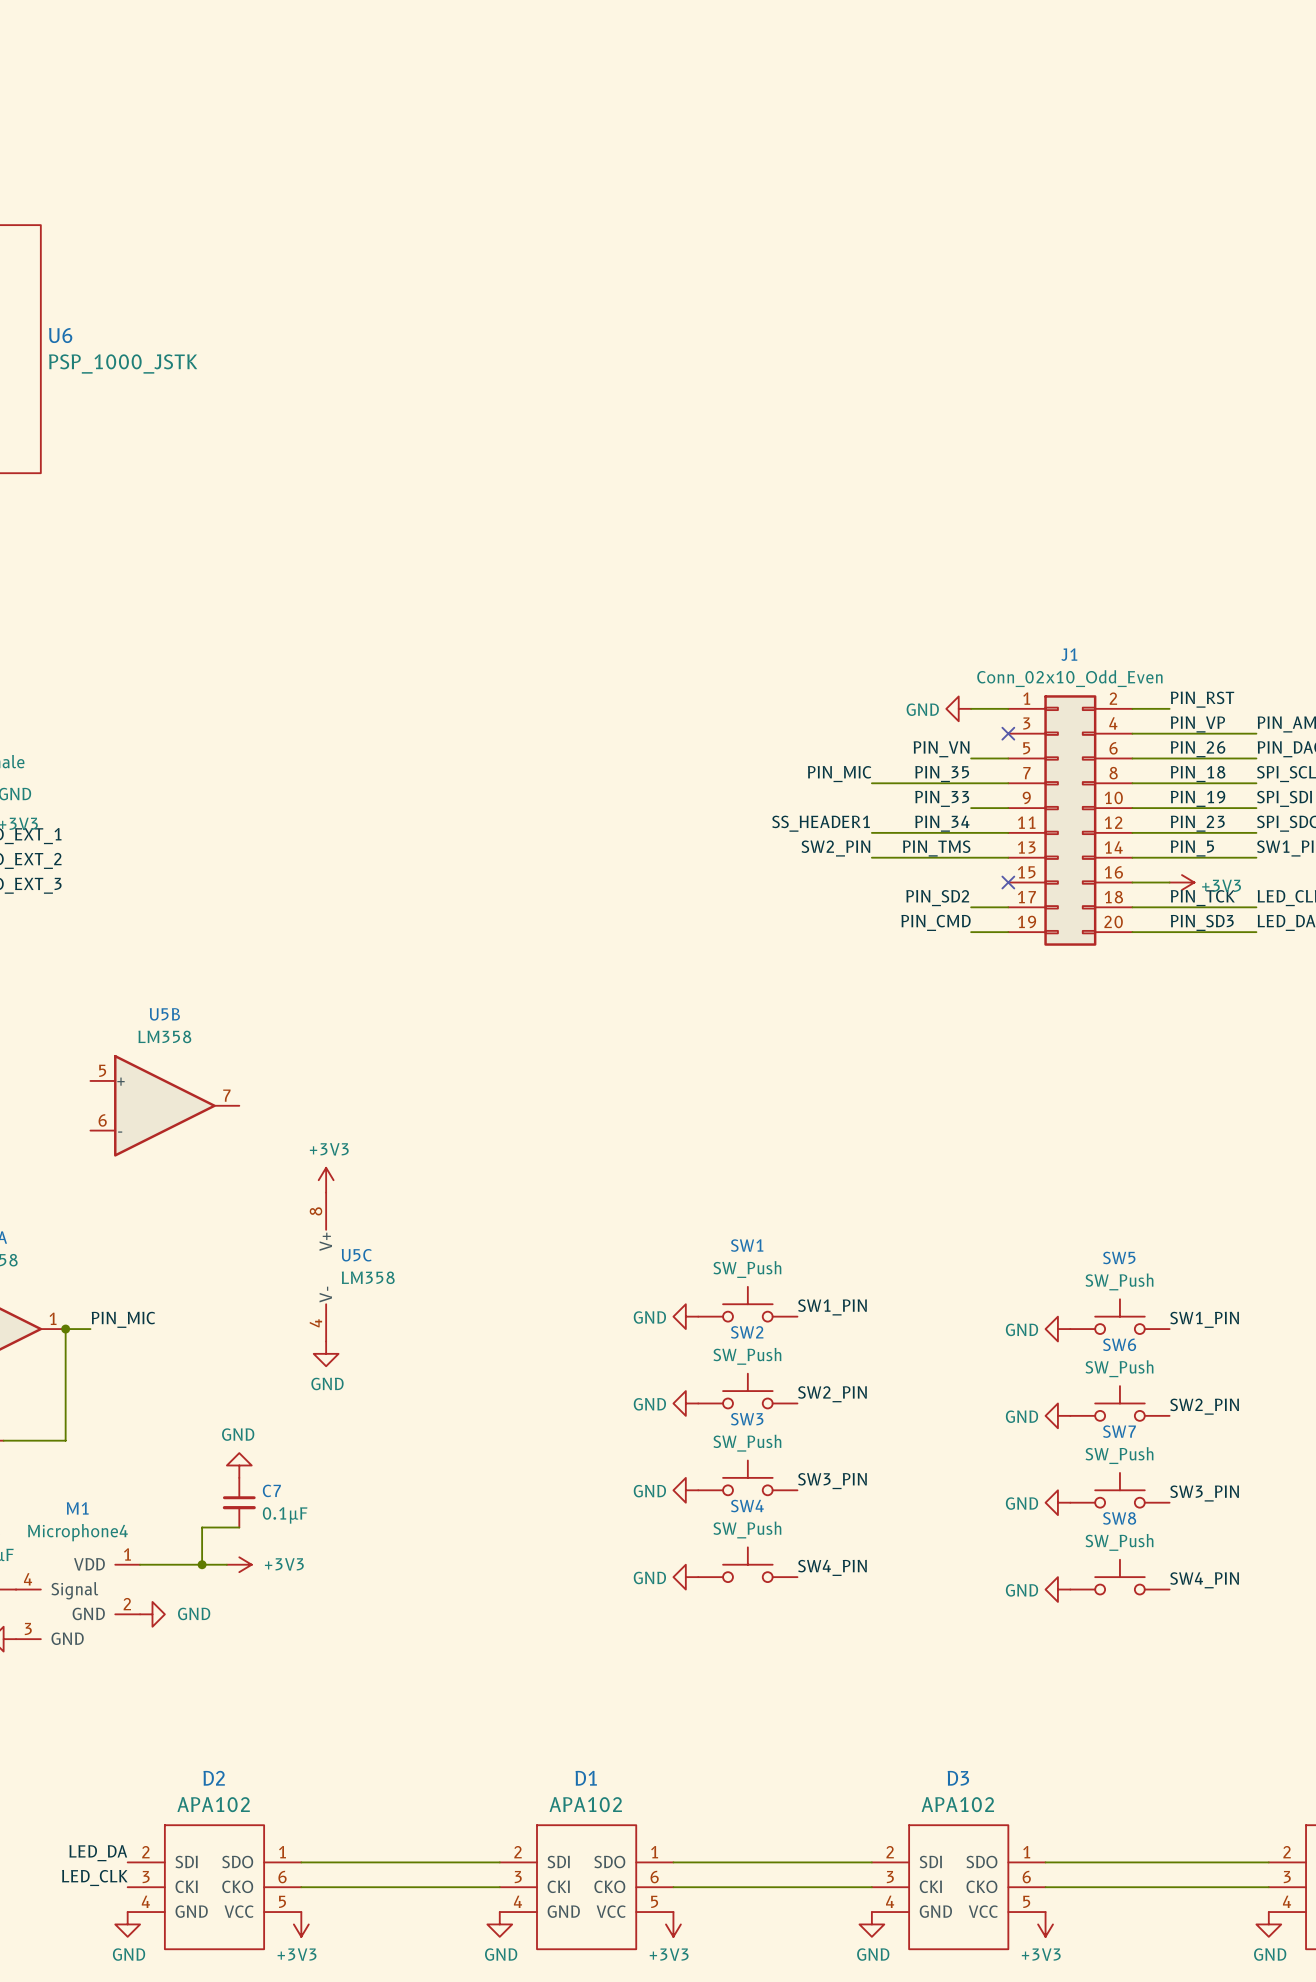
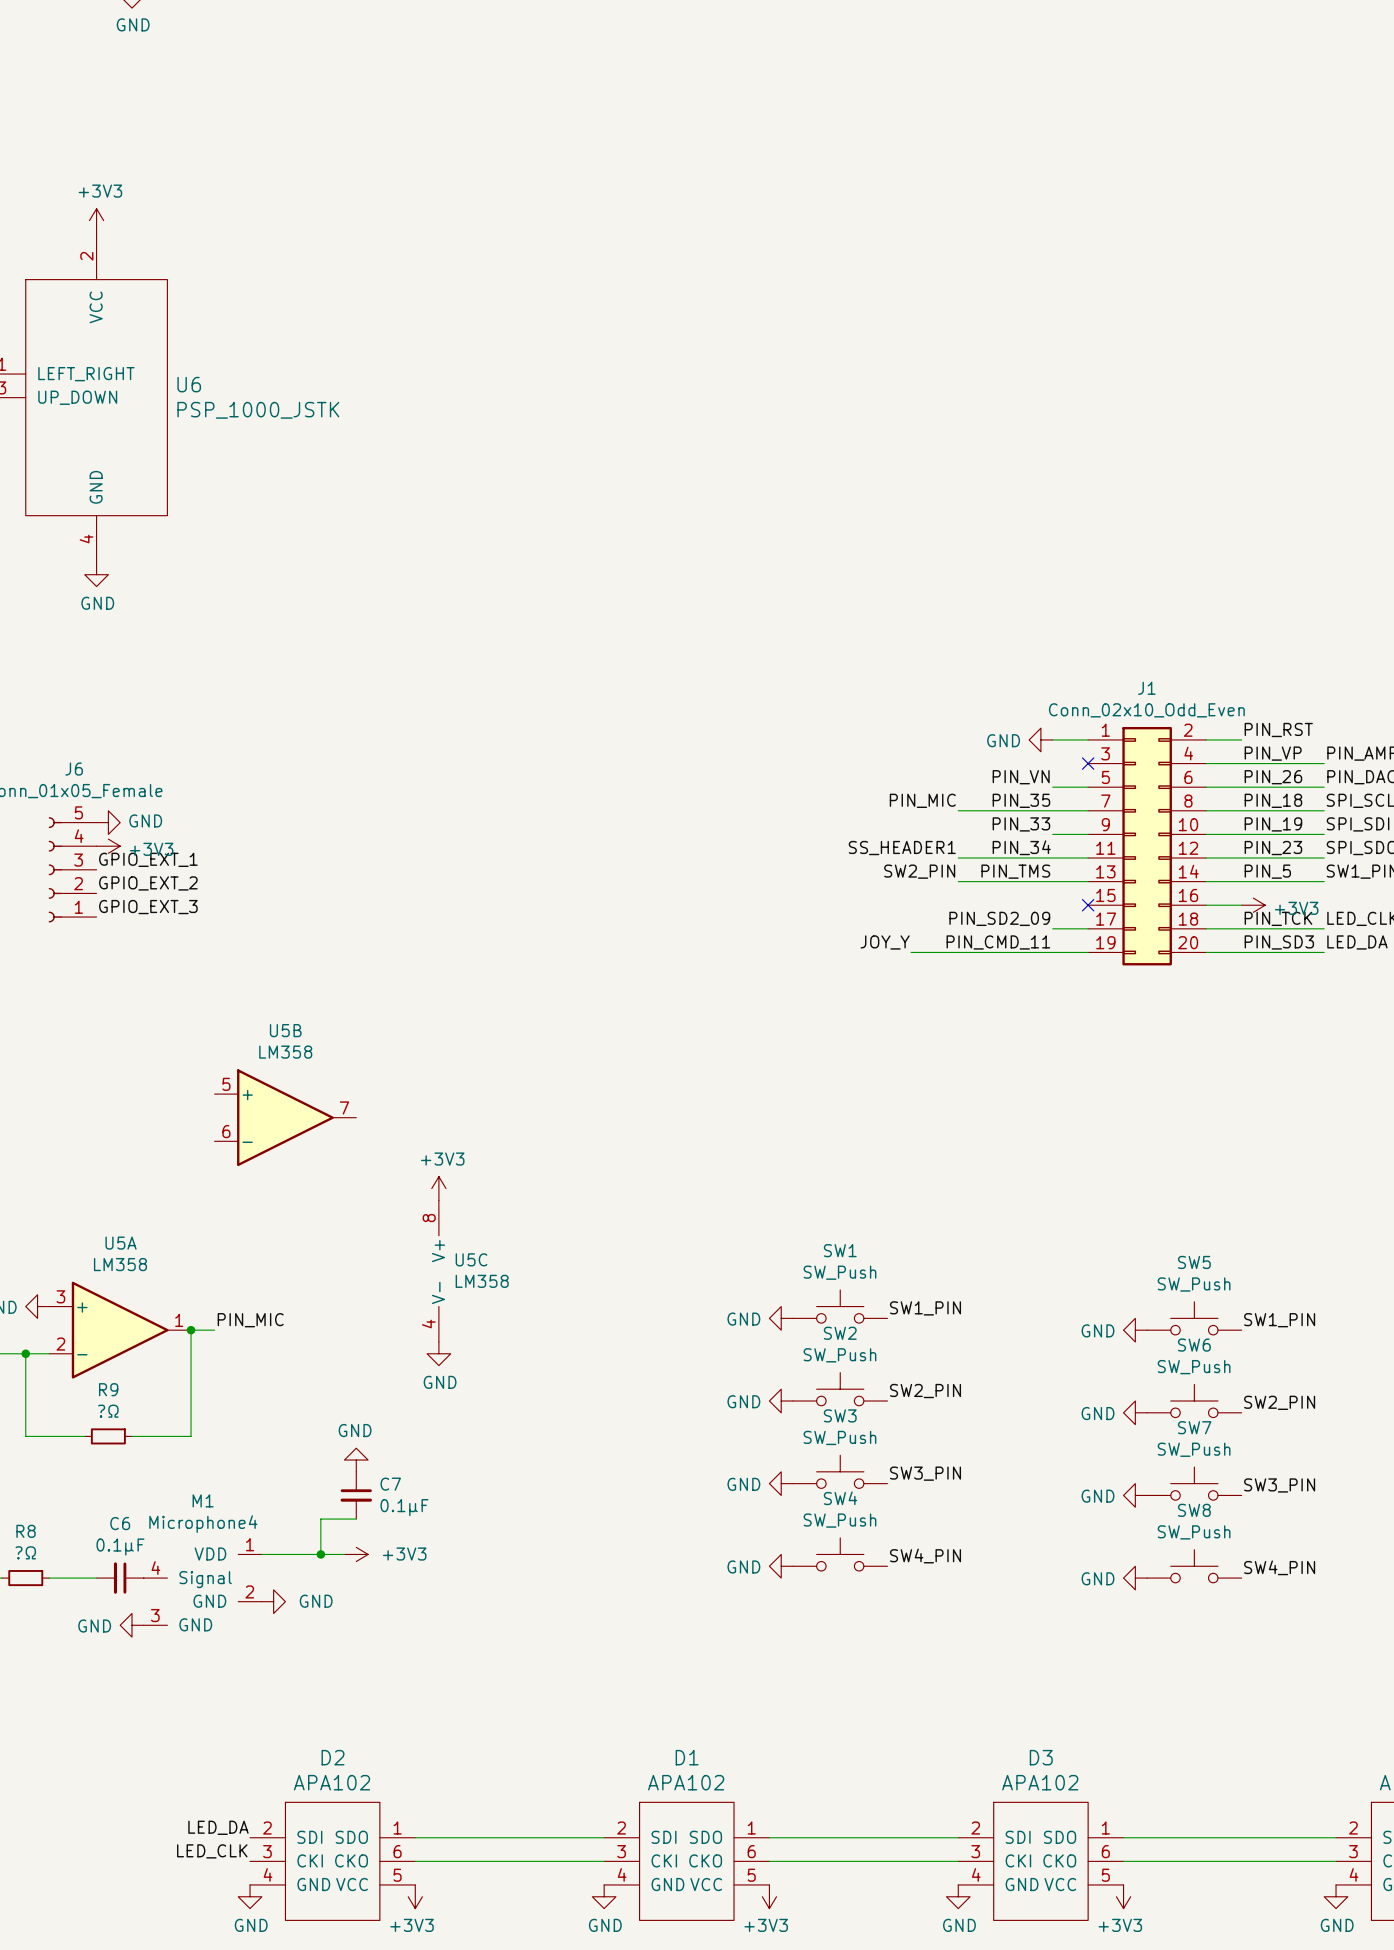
label: PIN_SD2 (937, 898) -> PIN_SD2_09 (999, 918)
label: none -> JOY_Y (885, 942)
label: PIN_CMD (936, 922) -> PIN_CMD_11 (998, 942)
wire: none -> (911, 952) (1052, 952)

